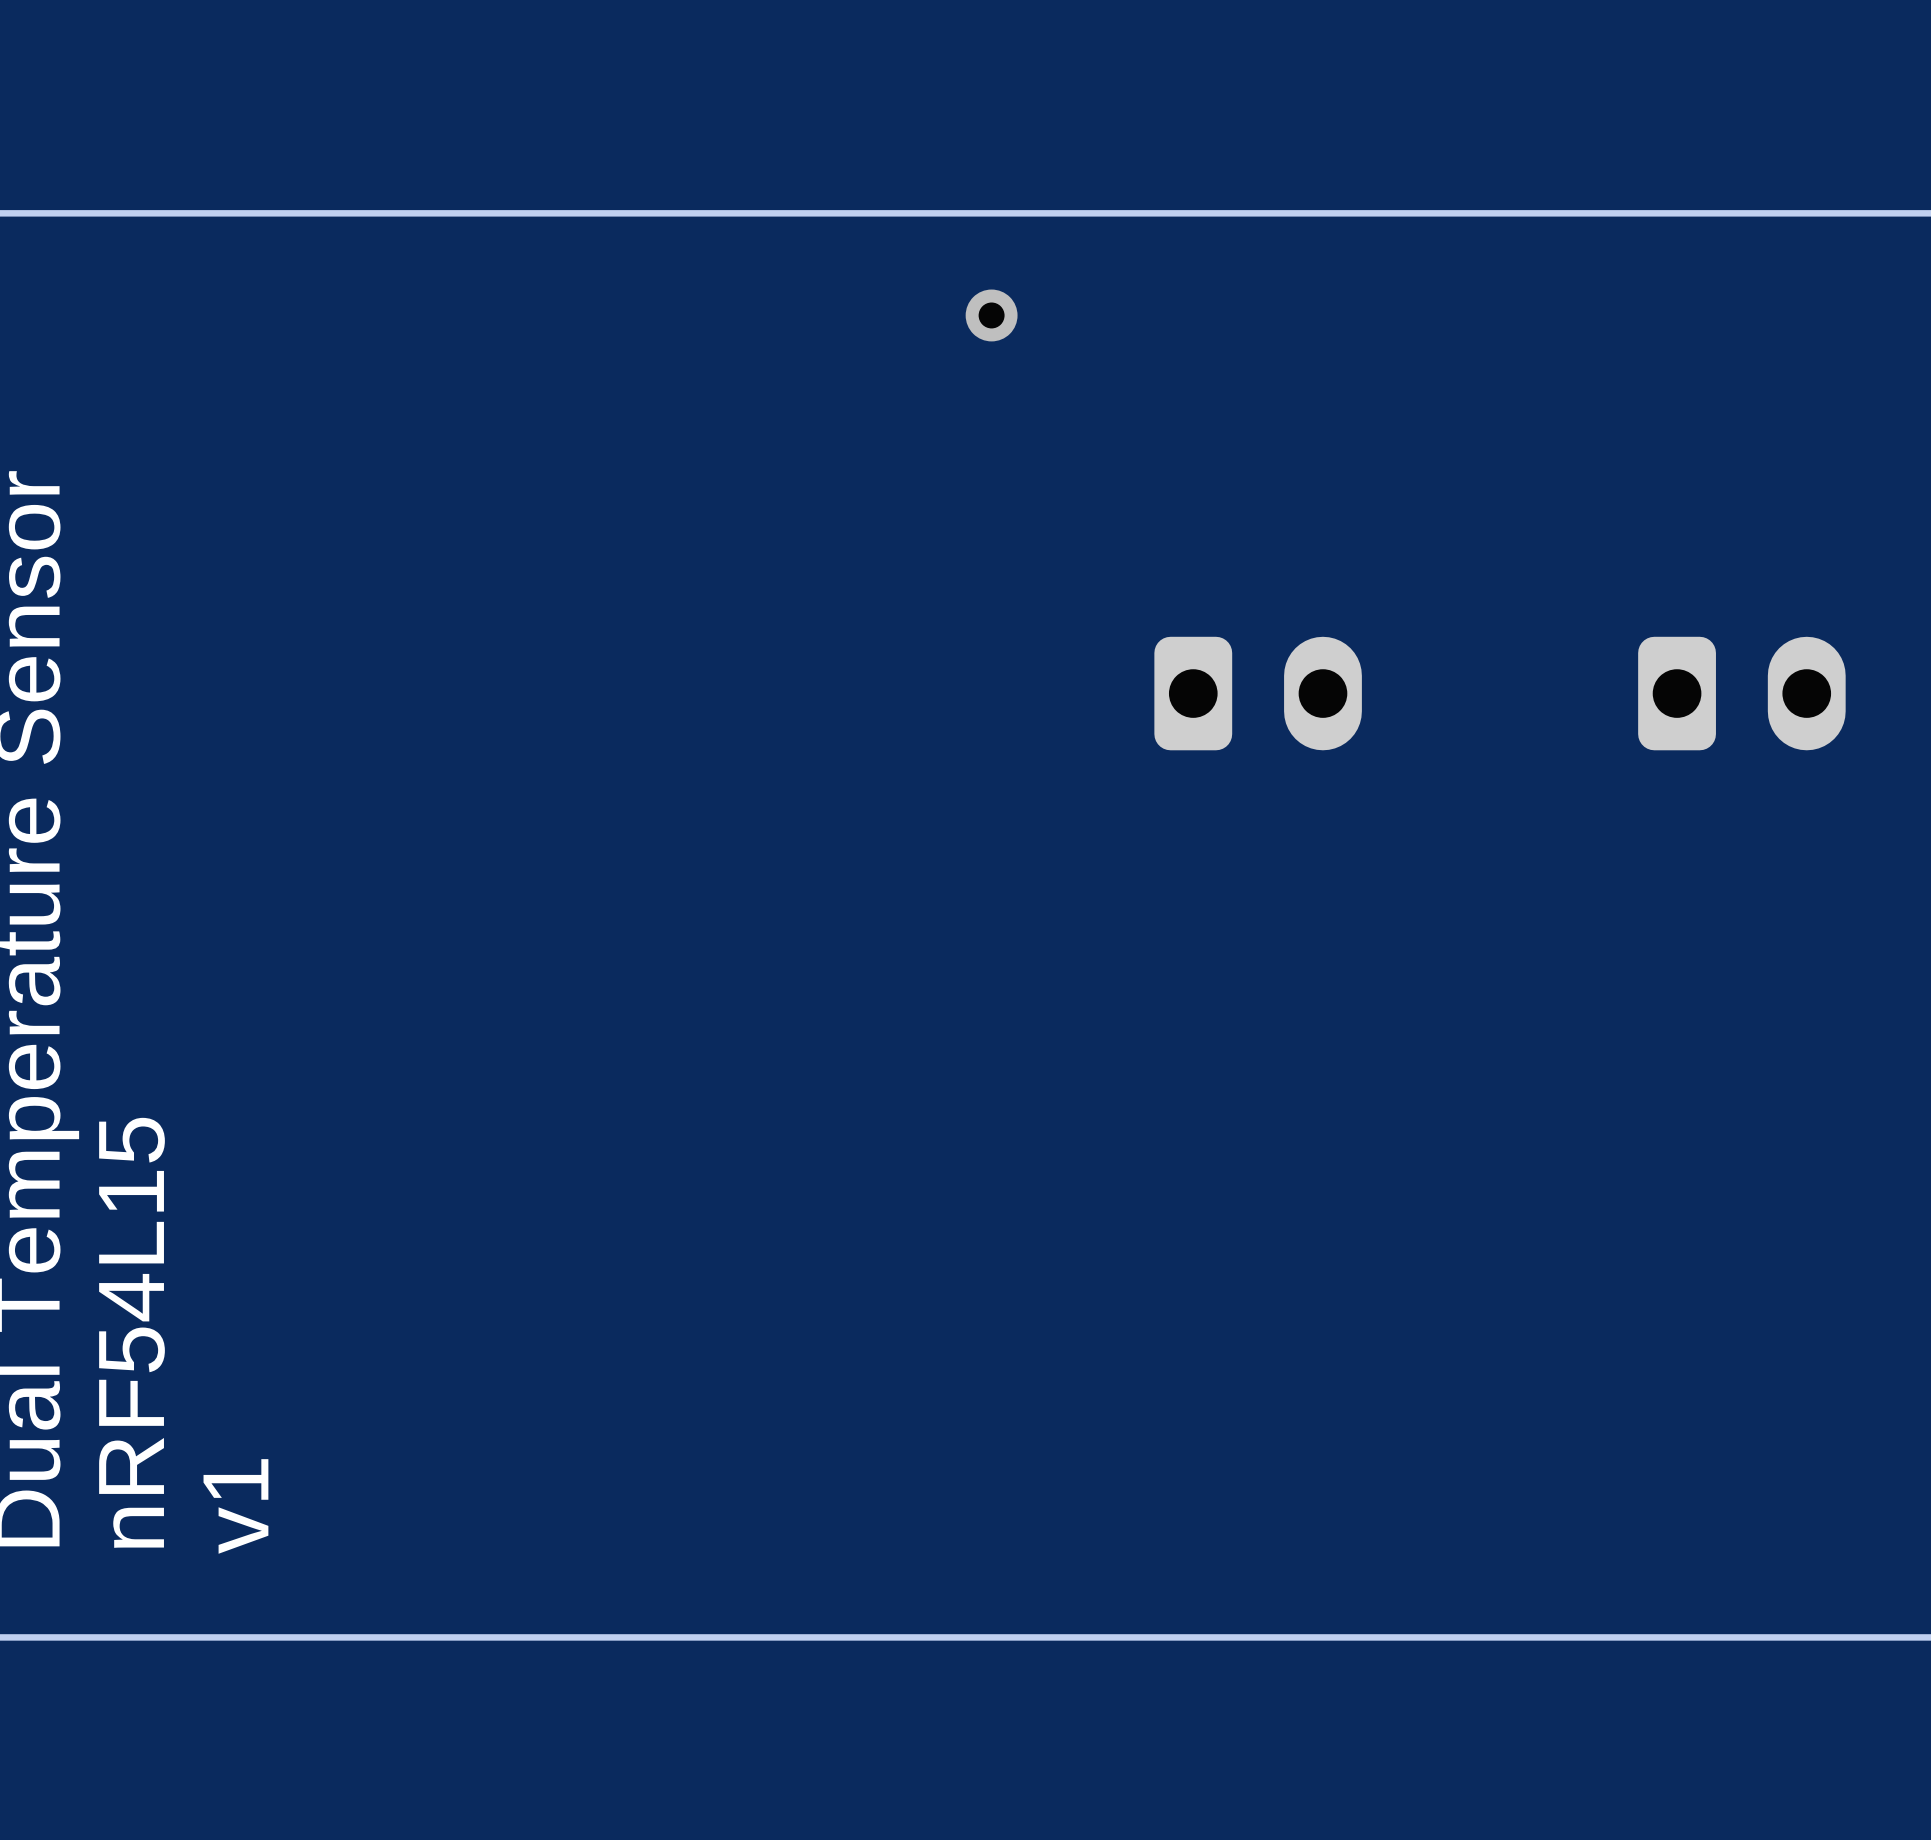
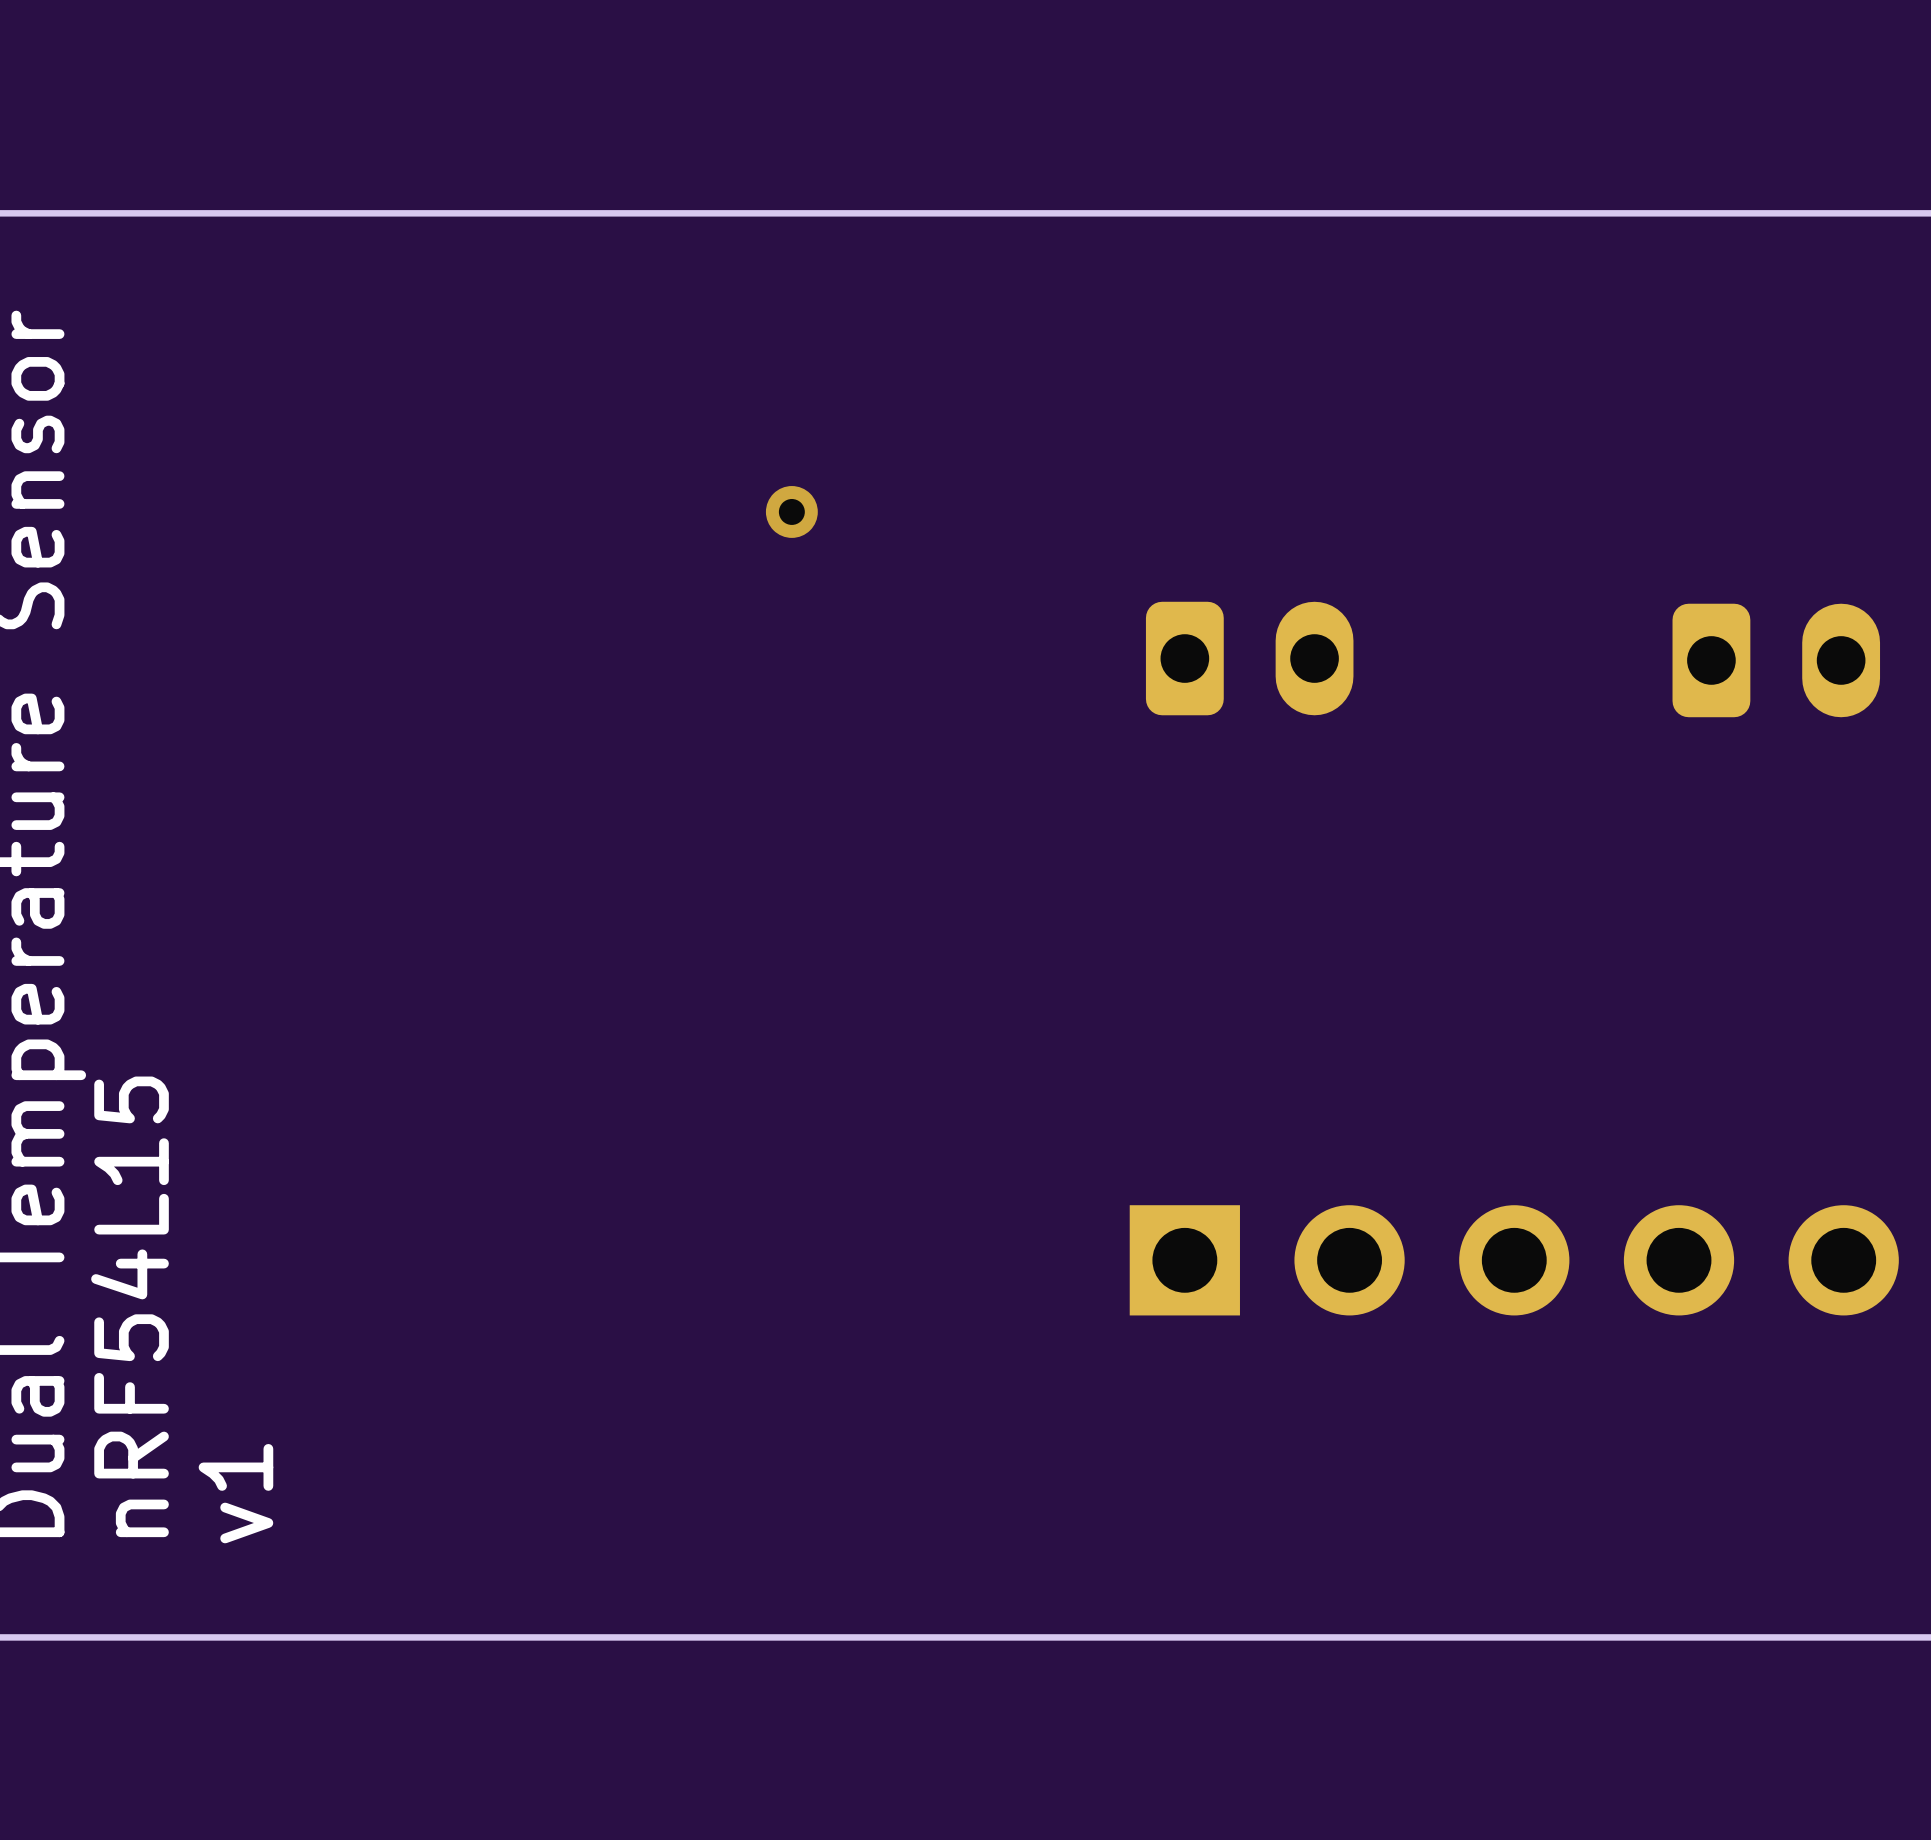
via position: (991, 315) -> (791, 511)
part position: (1258, 693) -> (1249, 658)
part position: (1741, 693) -> (1776, 660)
part: none -> (1514, 1260)

